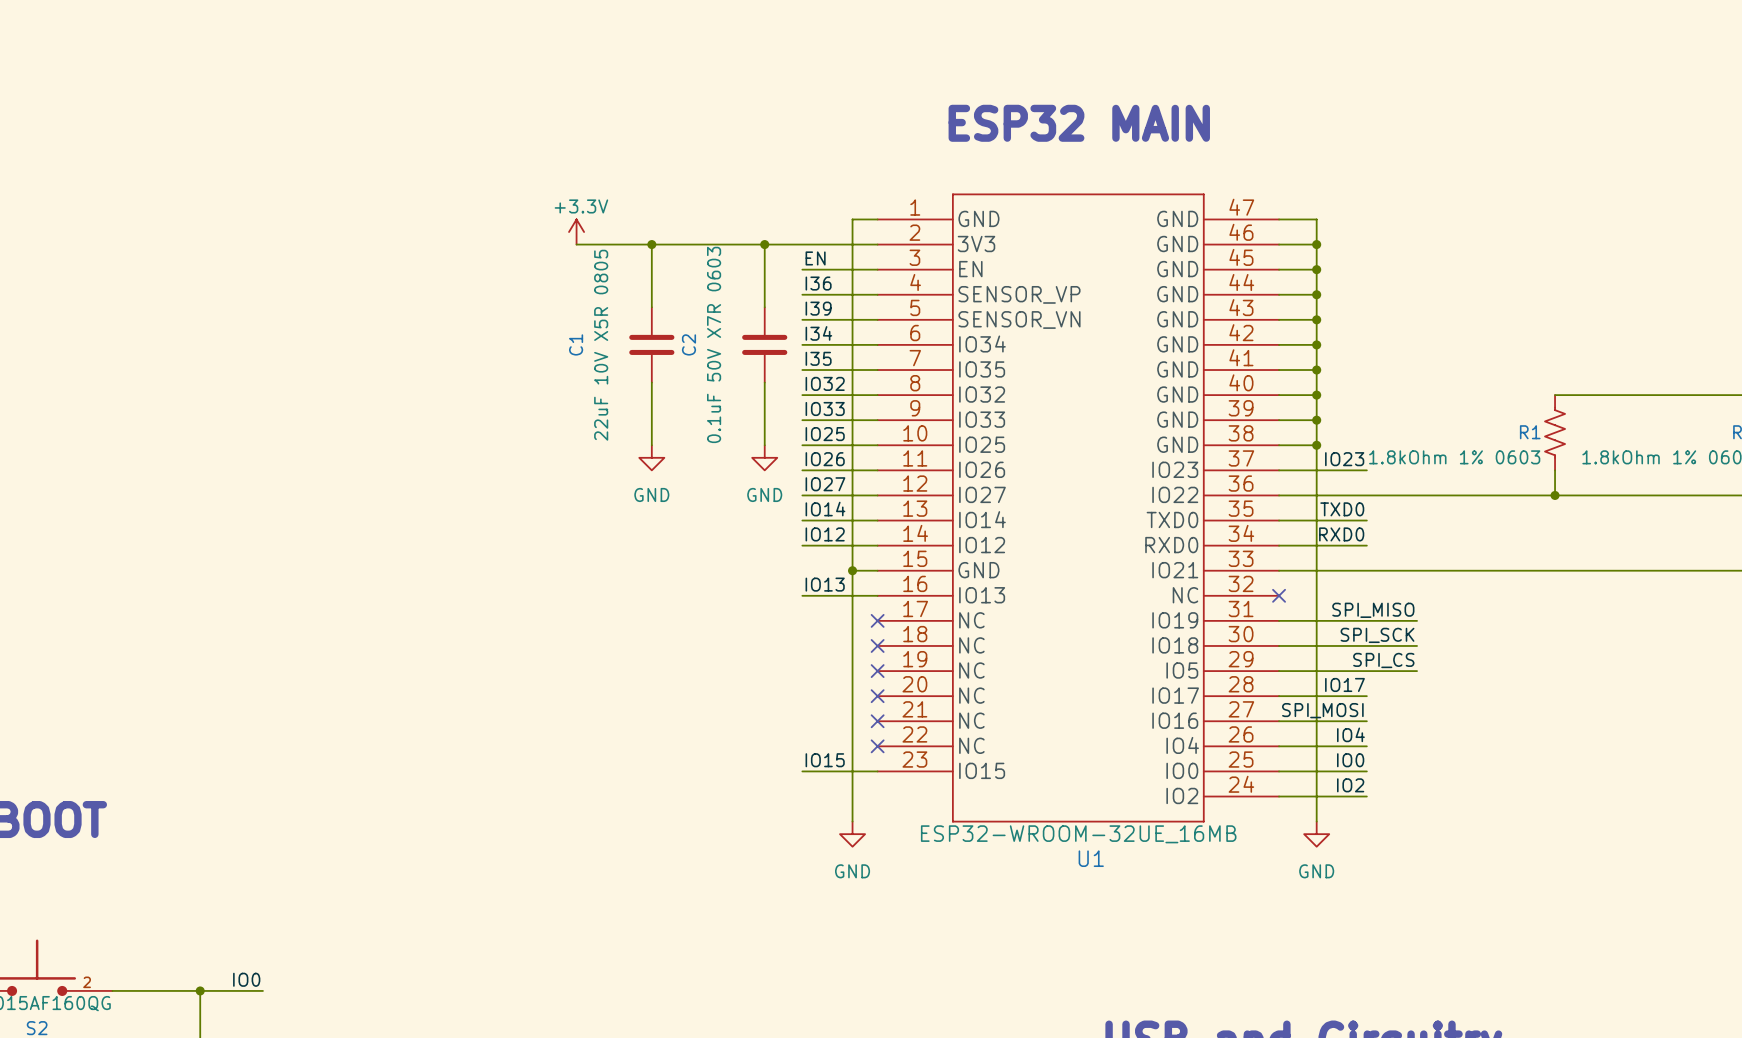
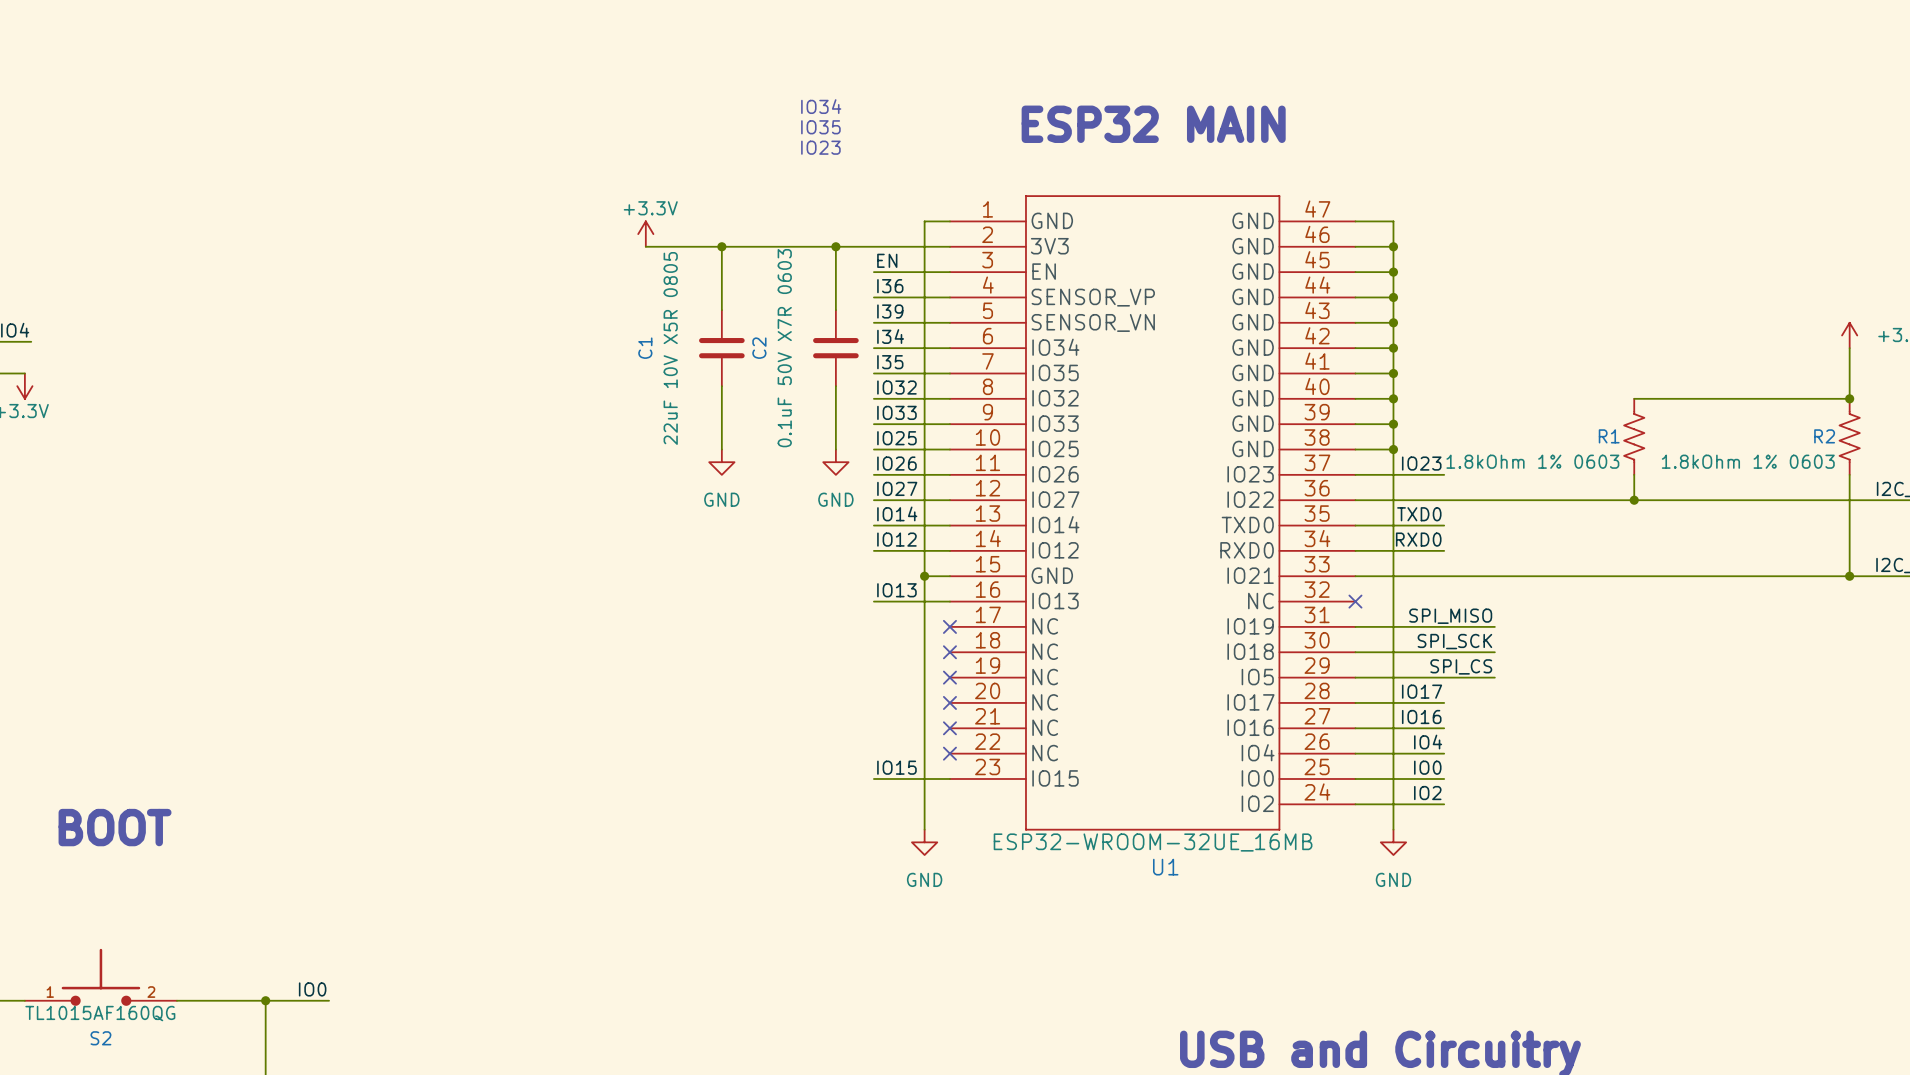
text: none -> IO34 (821, 106)
text: none -> IO35 (820, 127)
text: none -> IO23 (820, 147)
label: SPI_MOSI (1322, 710) -> IO16 (1421, 716)

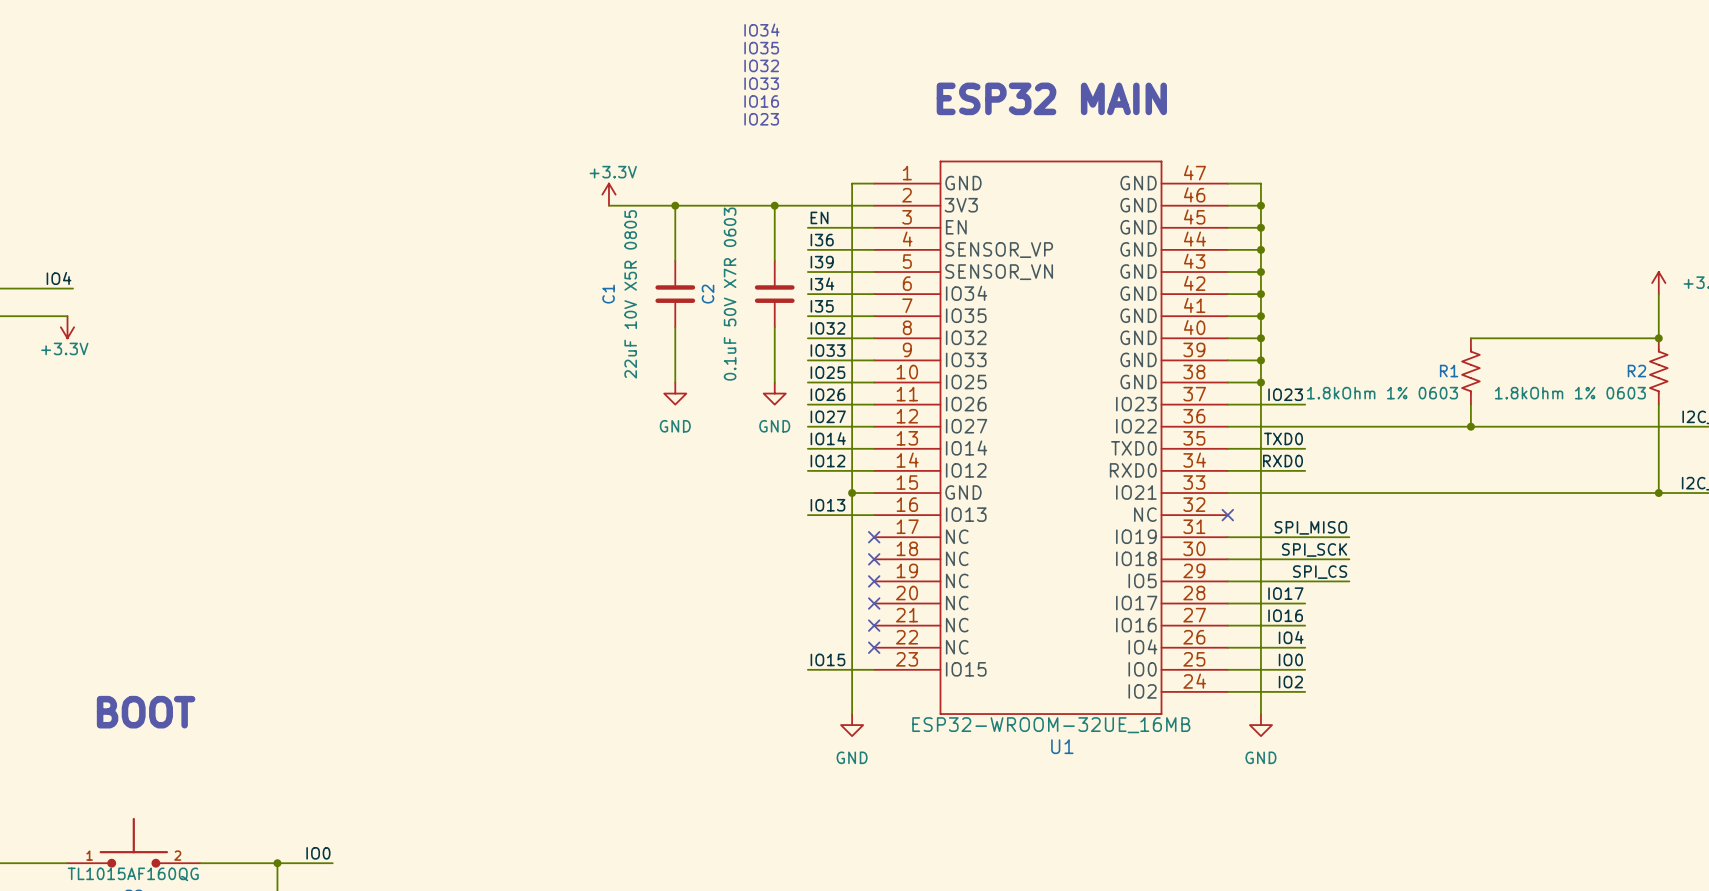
text: none -> IO34 (761, 30)
text: none -> IO35 (761, 48)
text: none -> IO32 (761, 65)
text: IO34 (821, 106) -> IO33 (761, 83)
text: IO35 (820, 127) -> IO16 (761, 101)

